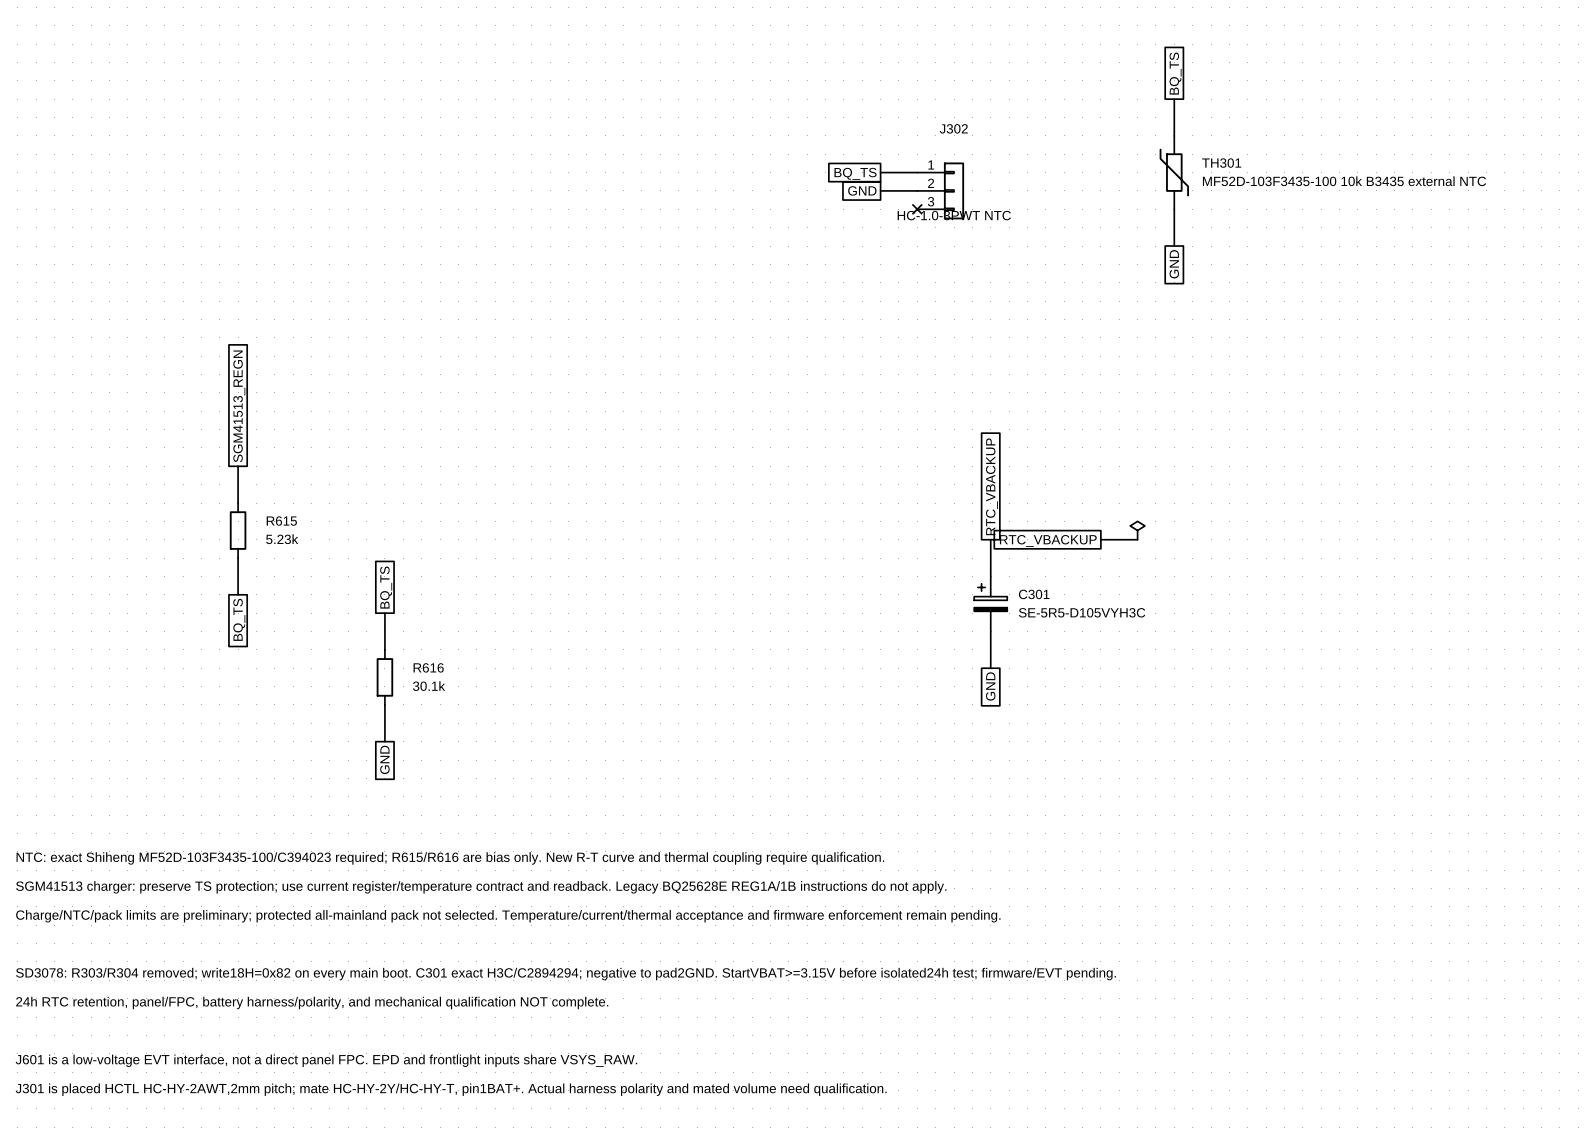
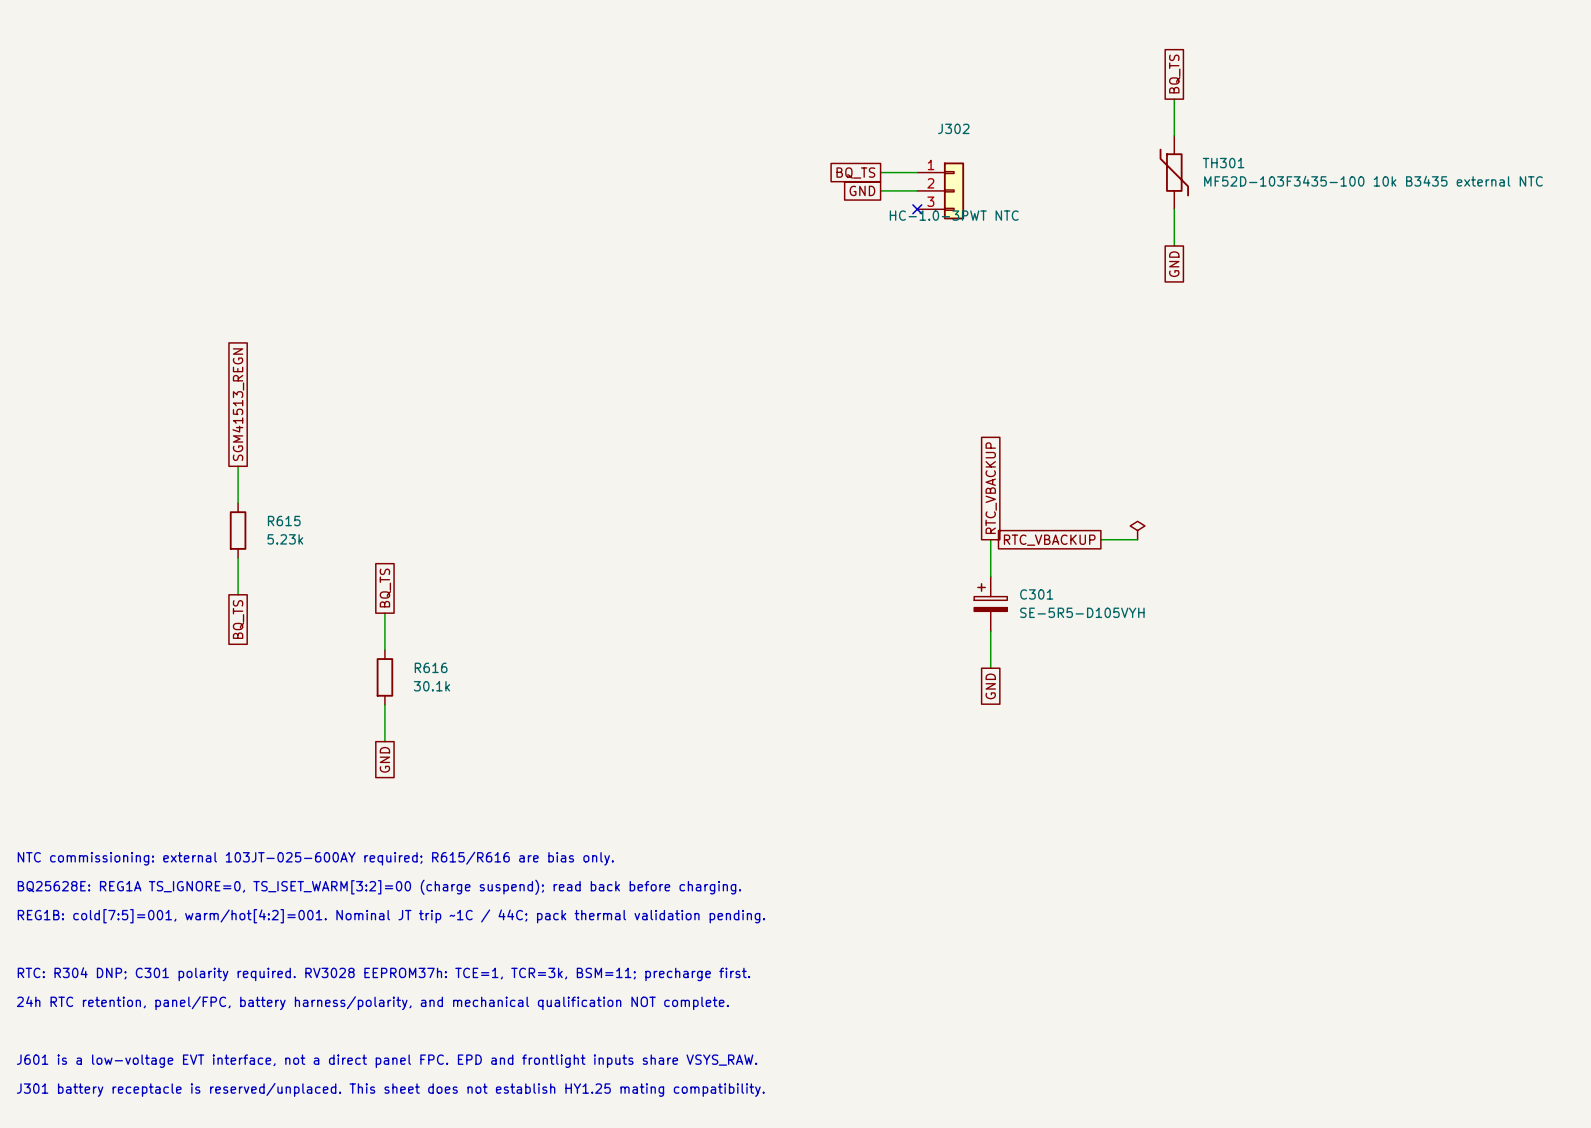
C301 value: SE-5R5-D105VYH3C (1082, 612) -> SE-5R5-D105VYH (1082, 612)
text: NTC: exact Shiheng MF52D-103F3435-100/C394023 required; R615/R616 are bias only. New R-T curve and thermal coupling require qualification. (450, 858) -> NTC commissioning: external 103JT-025-600AY required; R615/R616 are bias only. (315, 858)
text: SGM41513 charger: preserve TS protection; use current register/temperature contract and readback. Legacy BQ25628E REG1A/1B instructions do not apply. (481, 887) -> BQ25628E: REG1A TS_IGNORE=0, TS_ISET_WARM[3:2]=00 (charge suspend); read back before charging. (379, 887)
text: Charge/NTC/pack limits are preliminary; protected all-mainland pack not selected. Temperature/current/thermal acceptance and firmware enforcement remain pending. (508, 916) -> REG1B: cold[7:5]=001, warm/hot[4:2]=001. Nominal JT trip ~1C / 44C; pack thermal validation pending. (391, 916)
text: SD3078: R303/R304 removed; write18H=0x82 on every main boot. C301 exact H3C/C2894294; negative to pad2GND. StartVBAT>=3.15V before isolated24h test; firmware/EVT pending. (566, 974) -> RTC: R304 DNP; C301 polarity required. RV3028 EEPROM37h: TCE=1, TCR=3k, BSM=11; precharge first. (384, 974)
text: J301 is placed HCTL HC-HY-2AWT,2mm pitch; mate HC-HY-2Y/HC-HY-T, pin1BAT+. Actual harness polarity and mated volume need qualification. (451, 1089) -> J301 battery receptacle is reserved/unplaced. This sheet does not establish HY1.25 mating compatibility. (390, 1089)

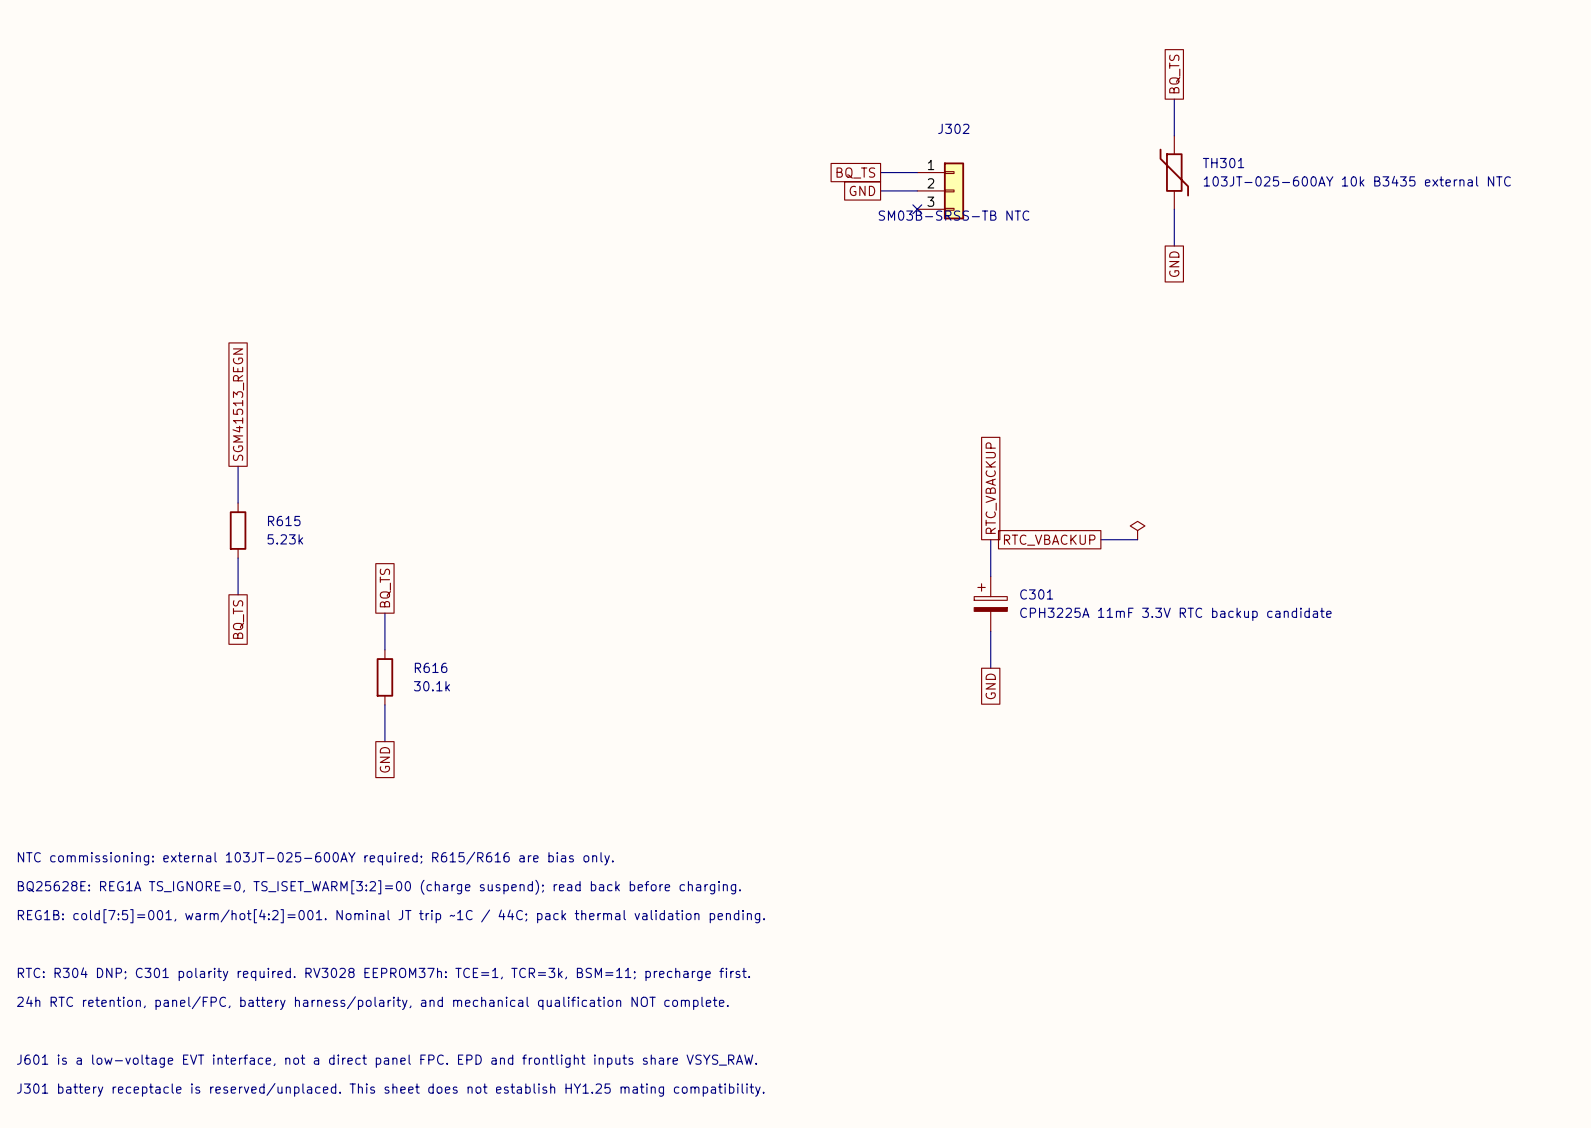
TH301 value: MF52D-103F3435-100 10k B3435 external NTC (1373, 181) -> 103JT-025-600AY 10k B3435 external NTC (1357, 181)
J302 value: HC-1.0-3PWT NTC (954, 215) -> SM03B-SRSS-TB NTC (954, 215)
C301 value: SE-5R5-D105VYH (1082, 612) -> CPH3225A 11mF 3.3V RTC backup candidate (1175, 614)

